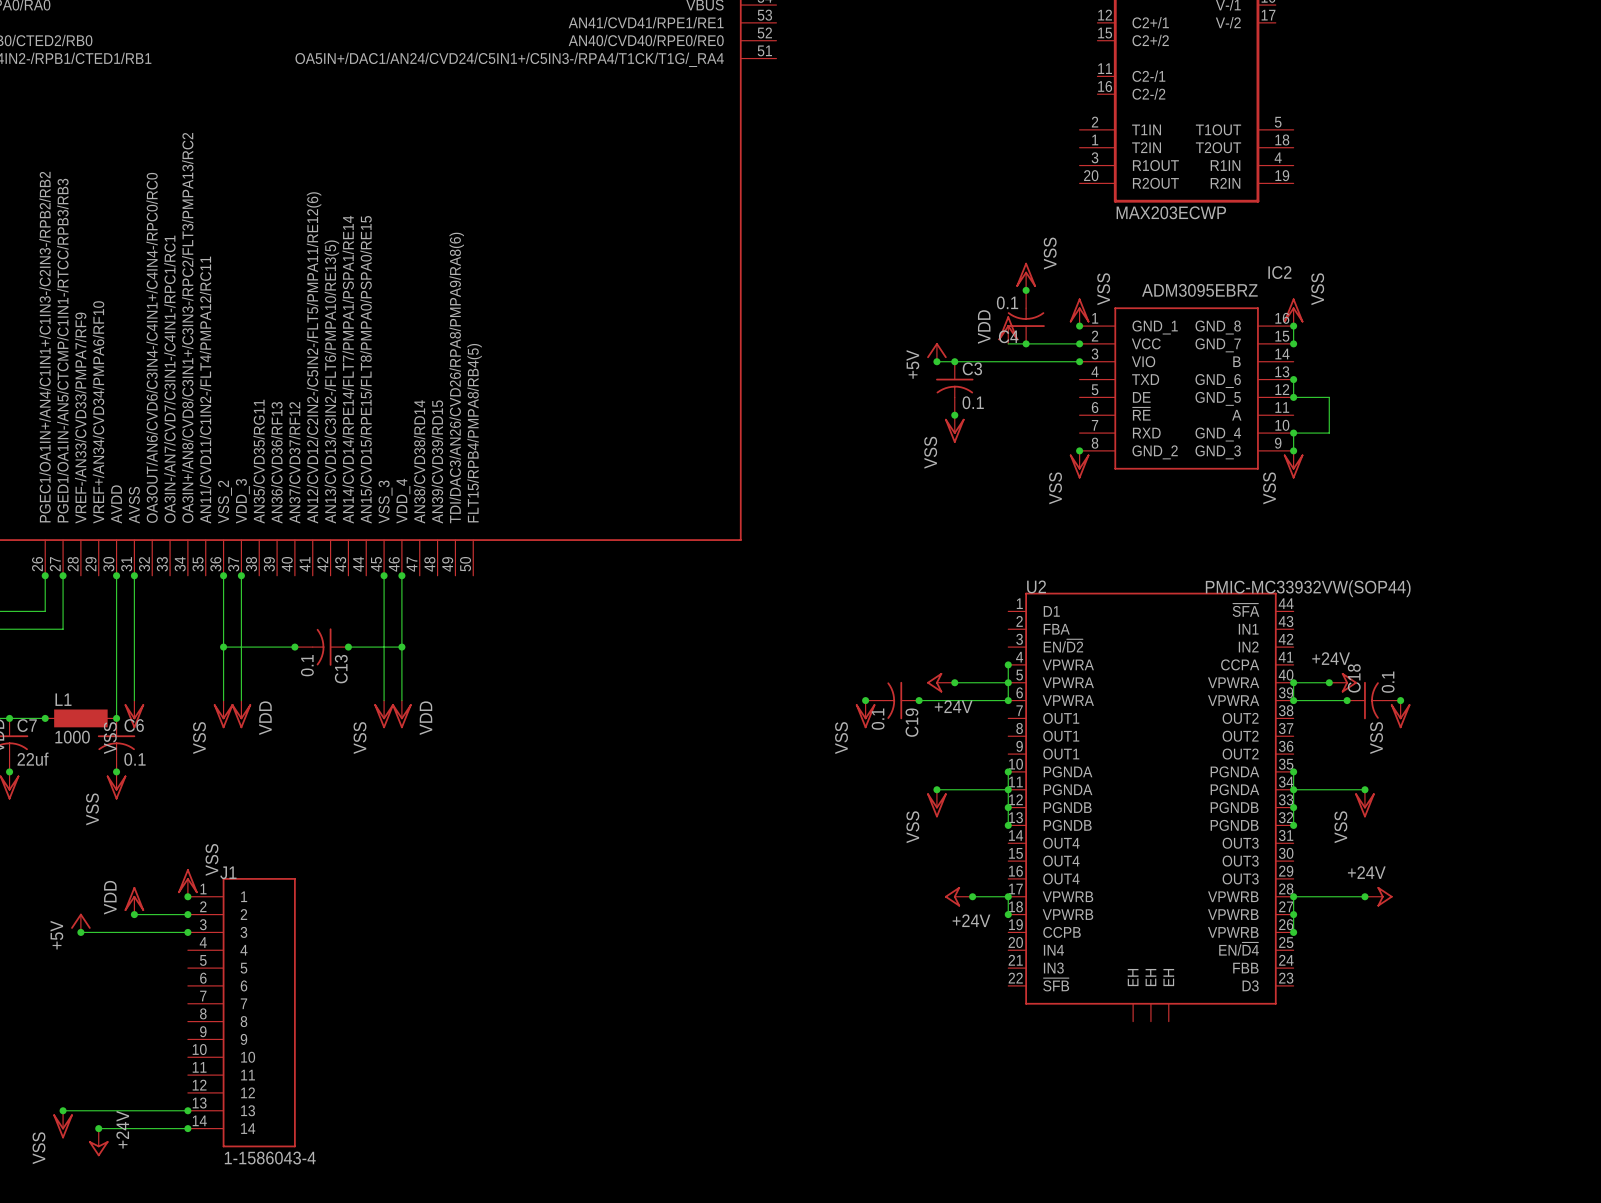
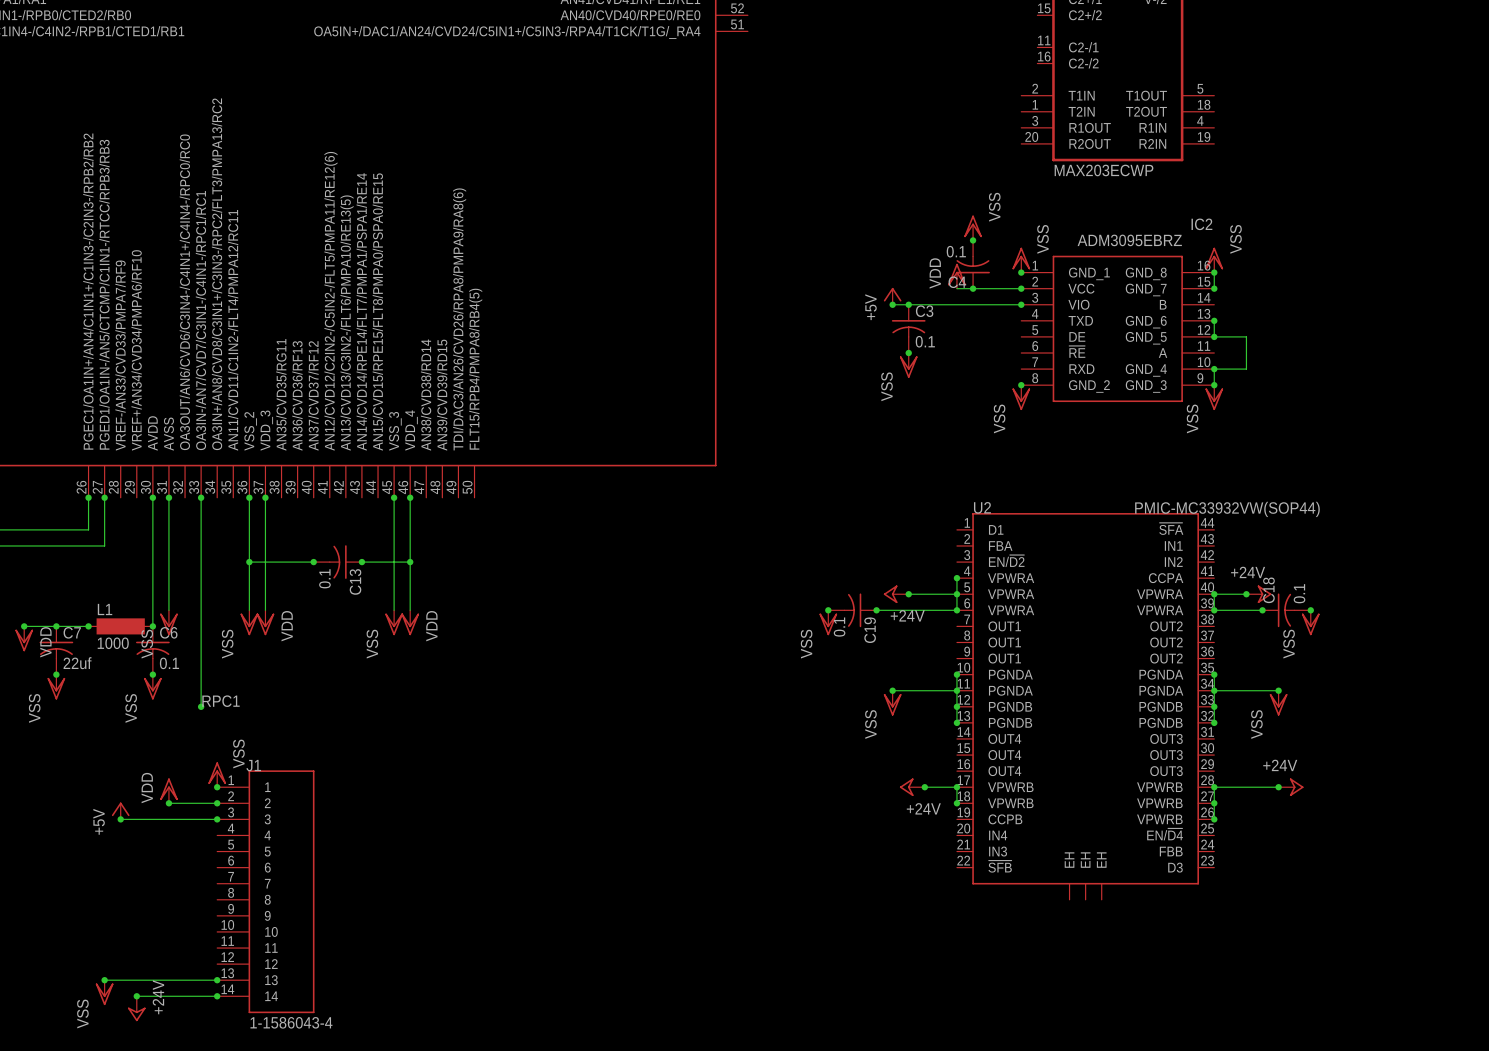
wire: none -> (201, 497) (201, 706)
junction: none -> (201, 497)
label: none -> RPC1 (221, 701)
junction: none -> (201, 706)

